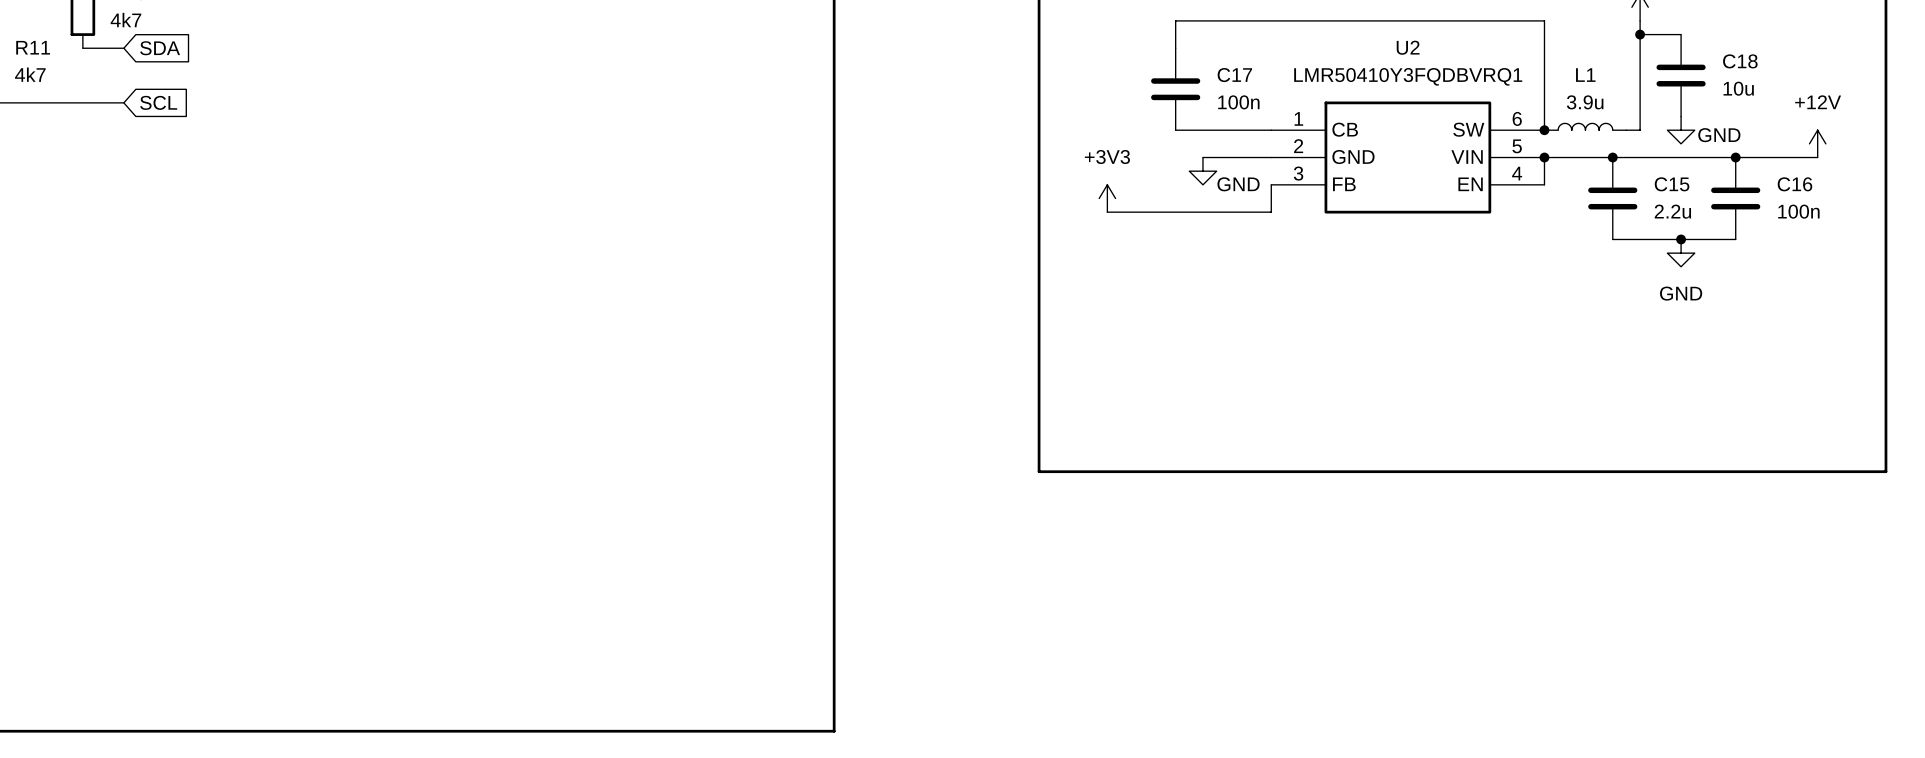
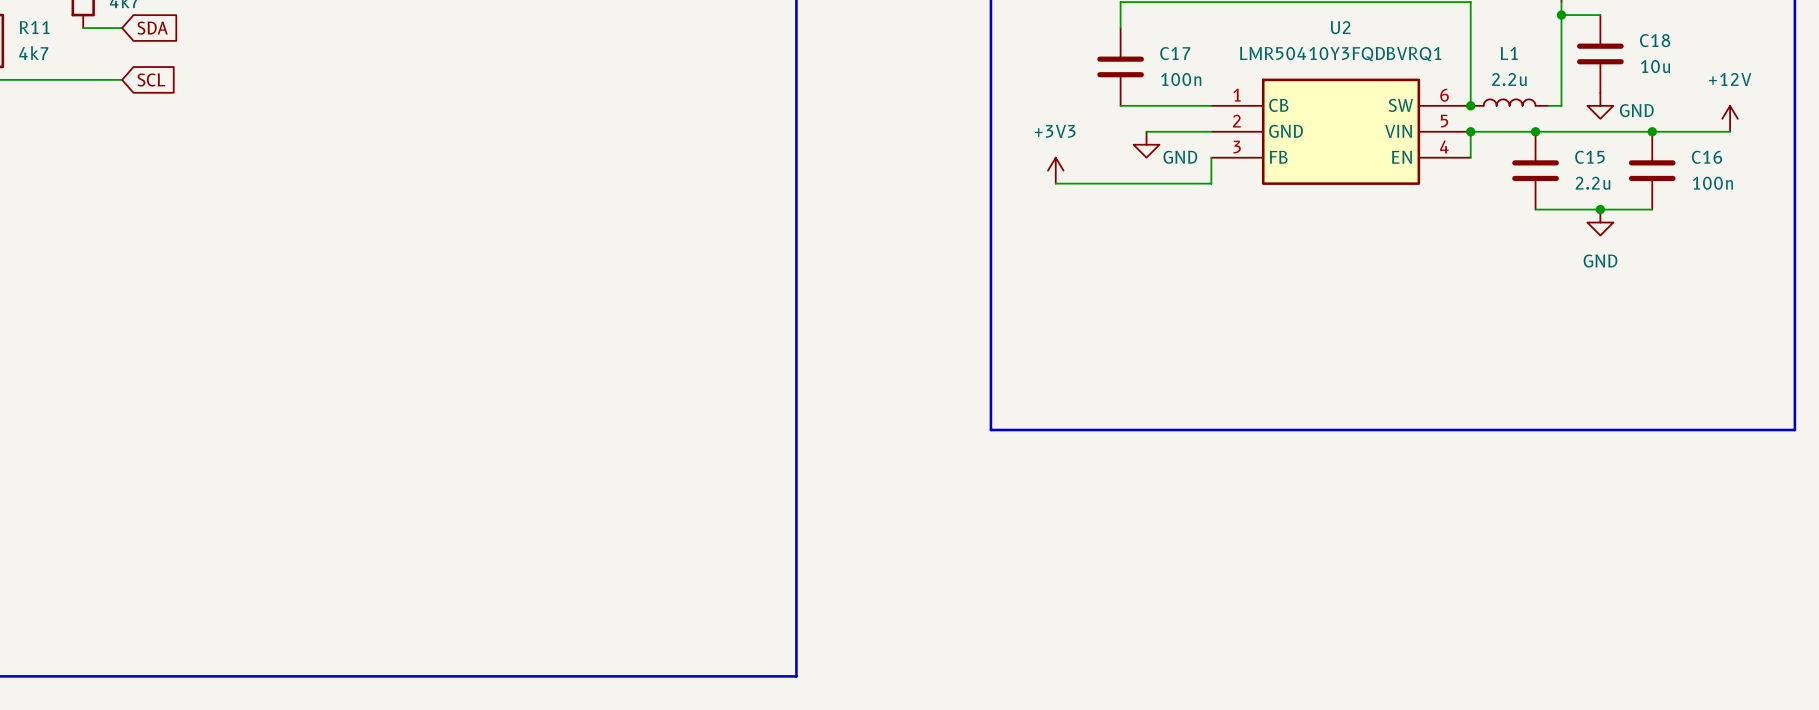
L1 value: 3.9u (1585, 102) -> 2.2u (1509, 79)

